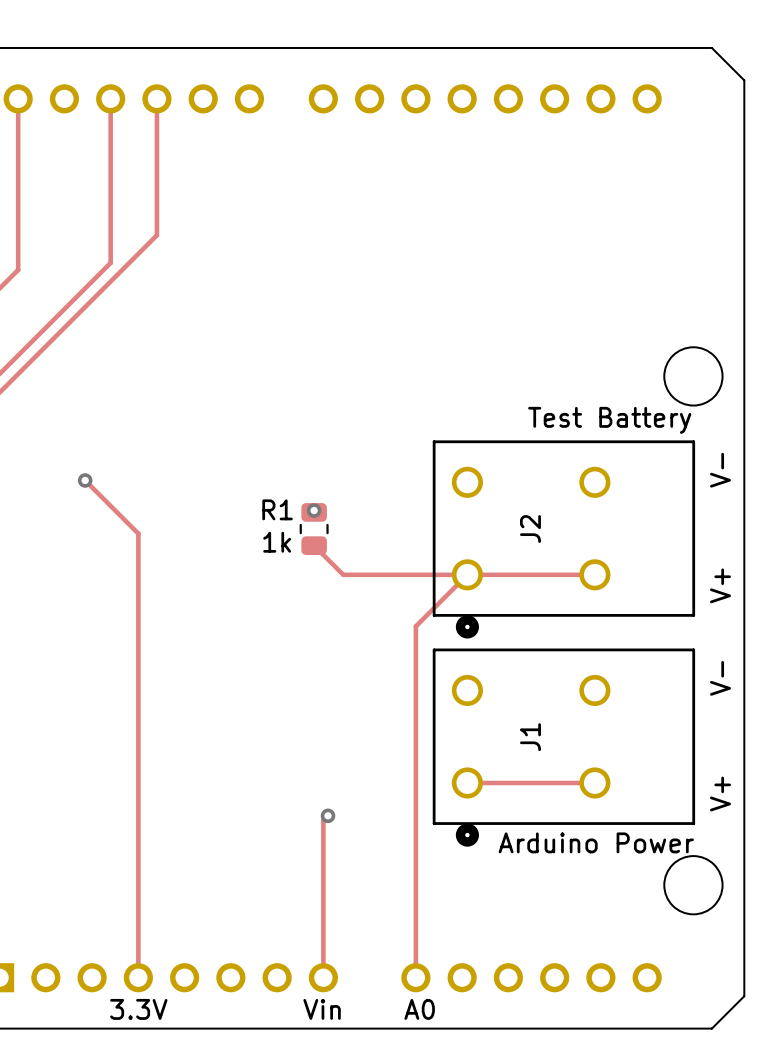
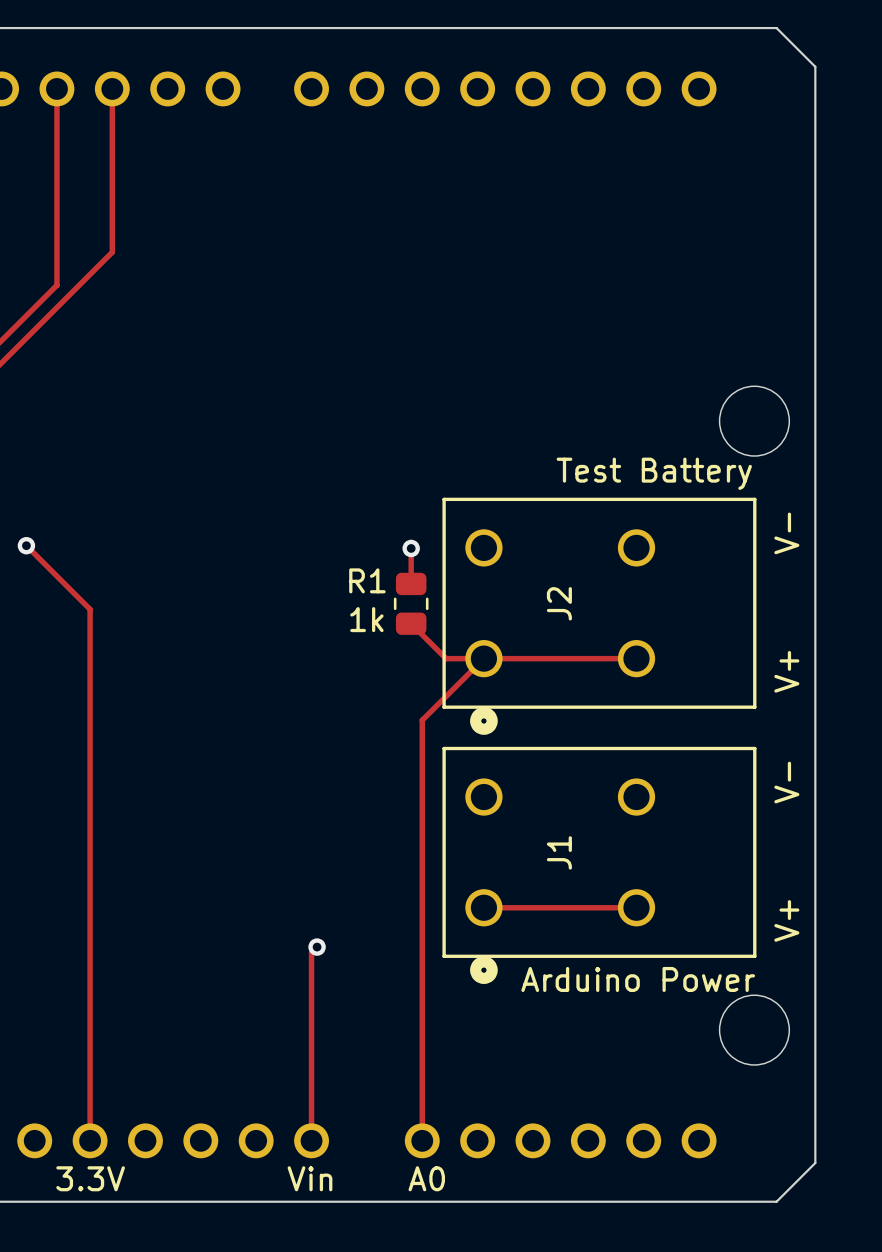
track: none -> (411, 548) (411, 583)
via position: (314, 510) -> (411, 548)
R1 position: (314, 529) -> (411, 603)
text position: 1k (277, 542) -> 1k (366, 619)
track: (314, 545) (343, 574) (435, 574) -> (411, 623) (446, 658)

